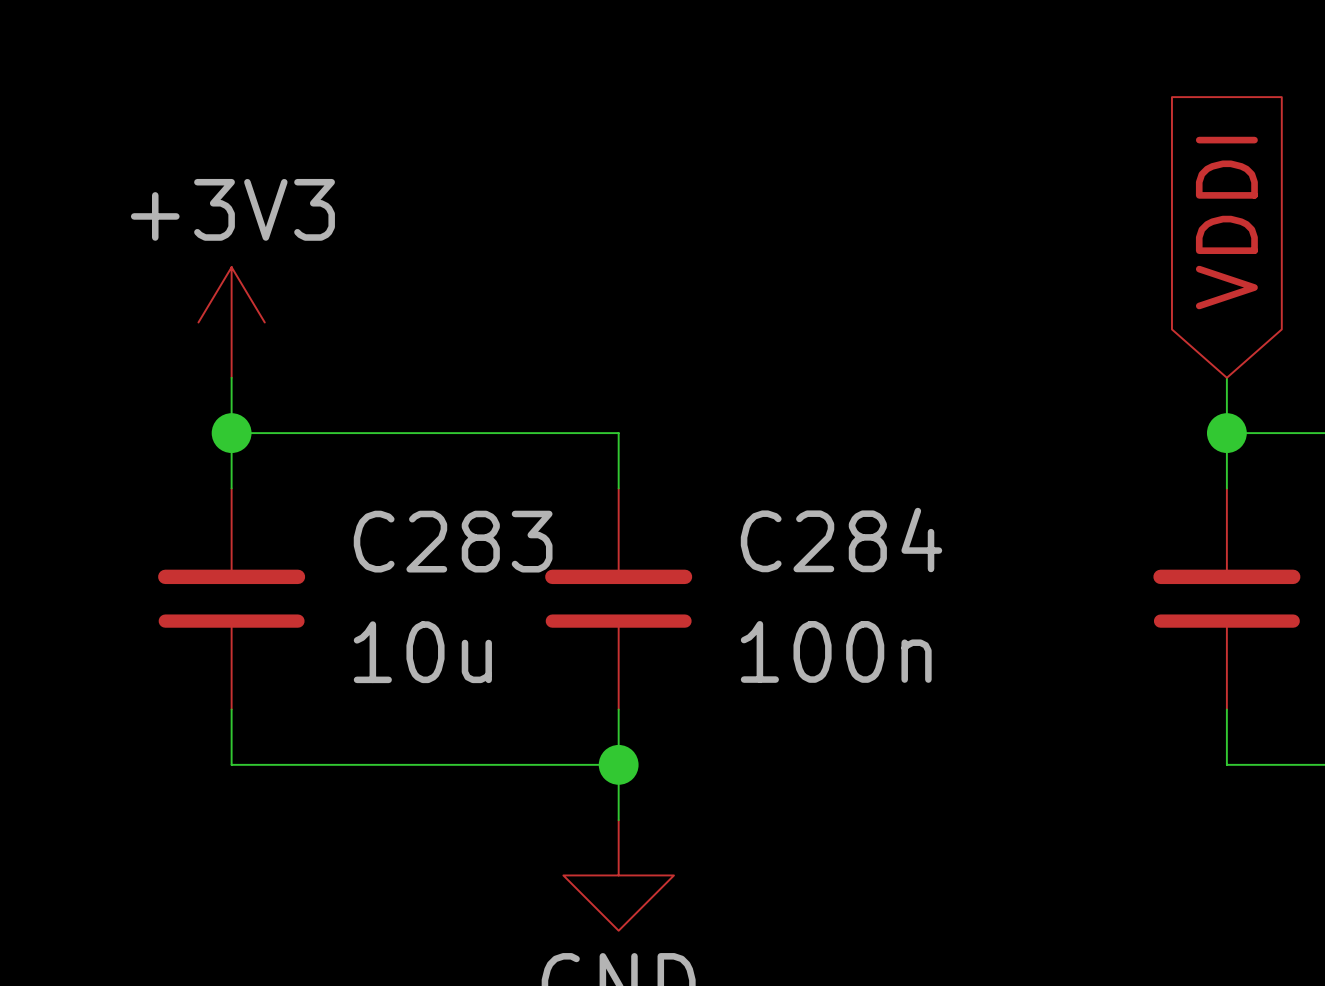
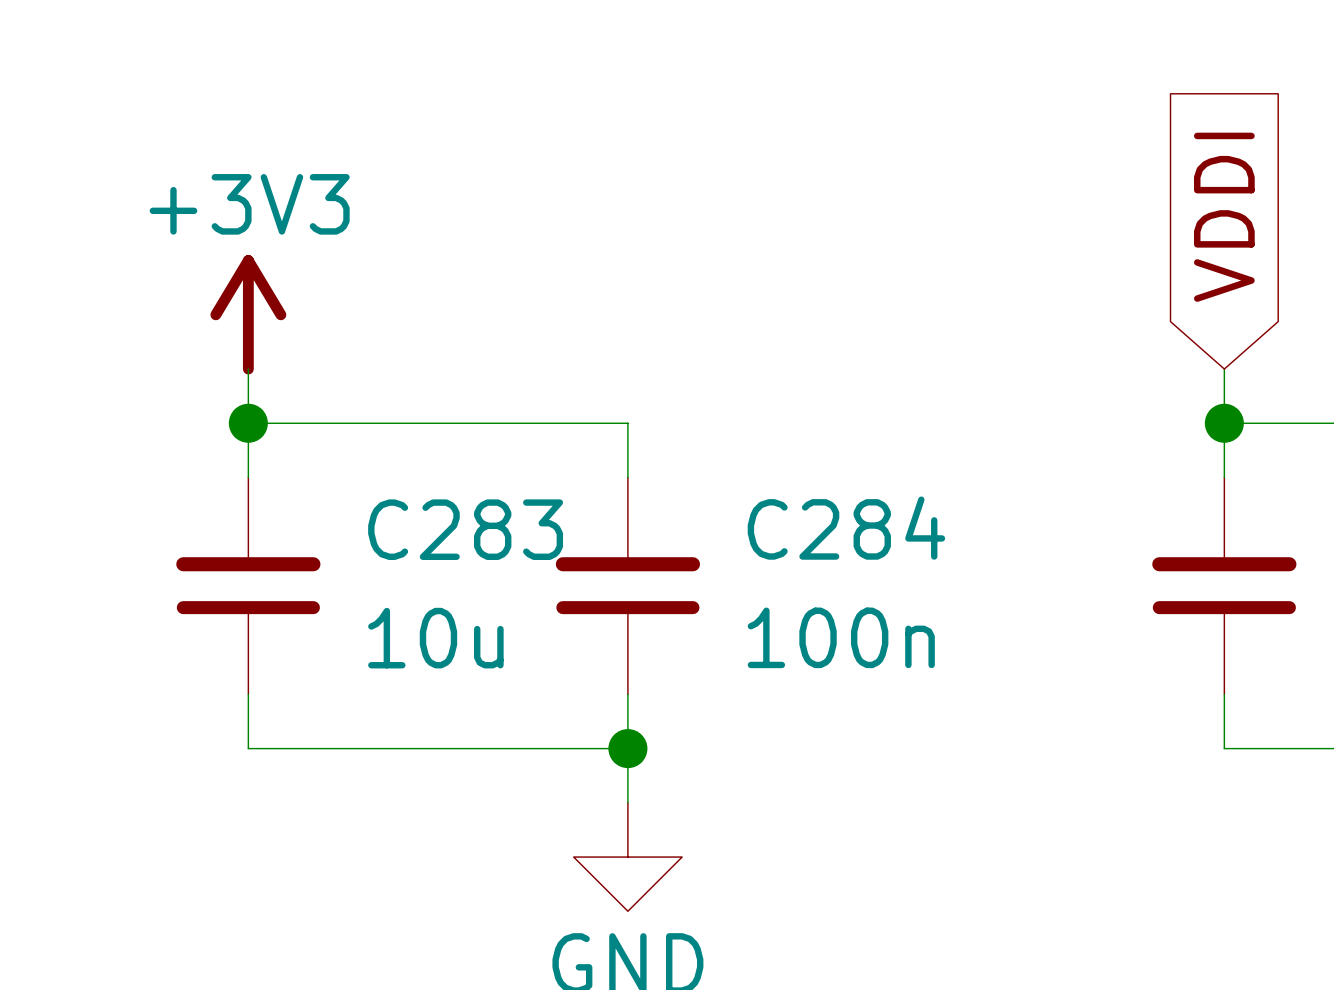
power symbol shape: [198, 267, 265, 378] -> [210, 255, 287, 375]

